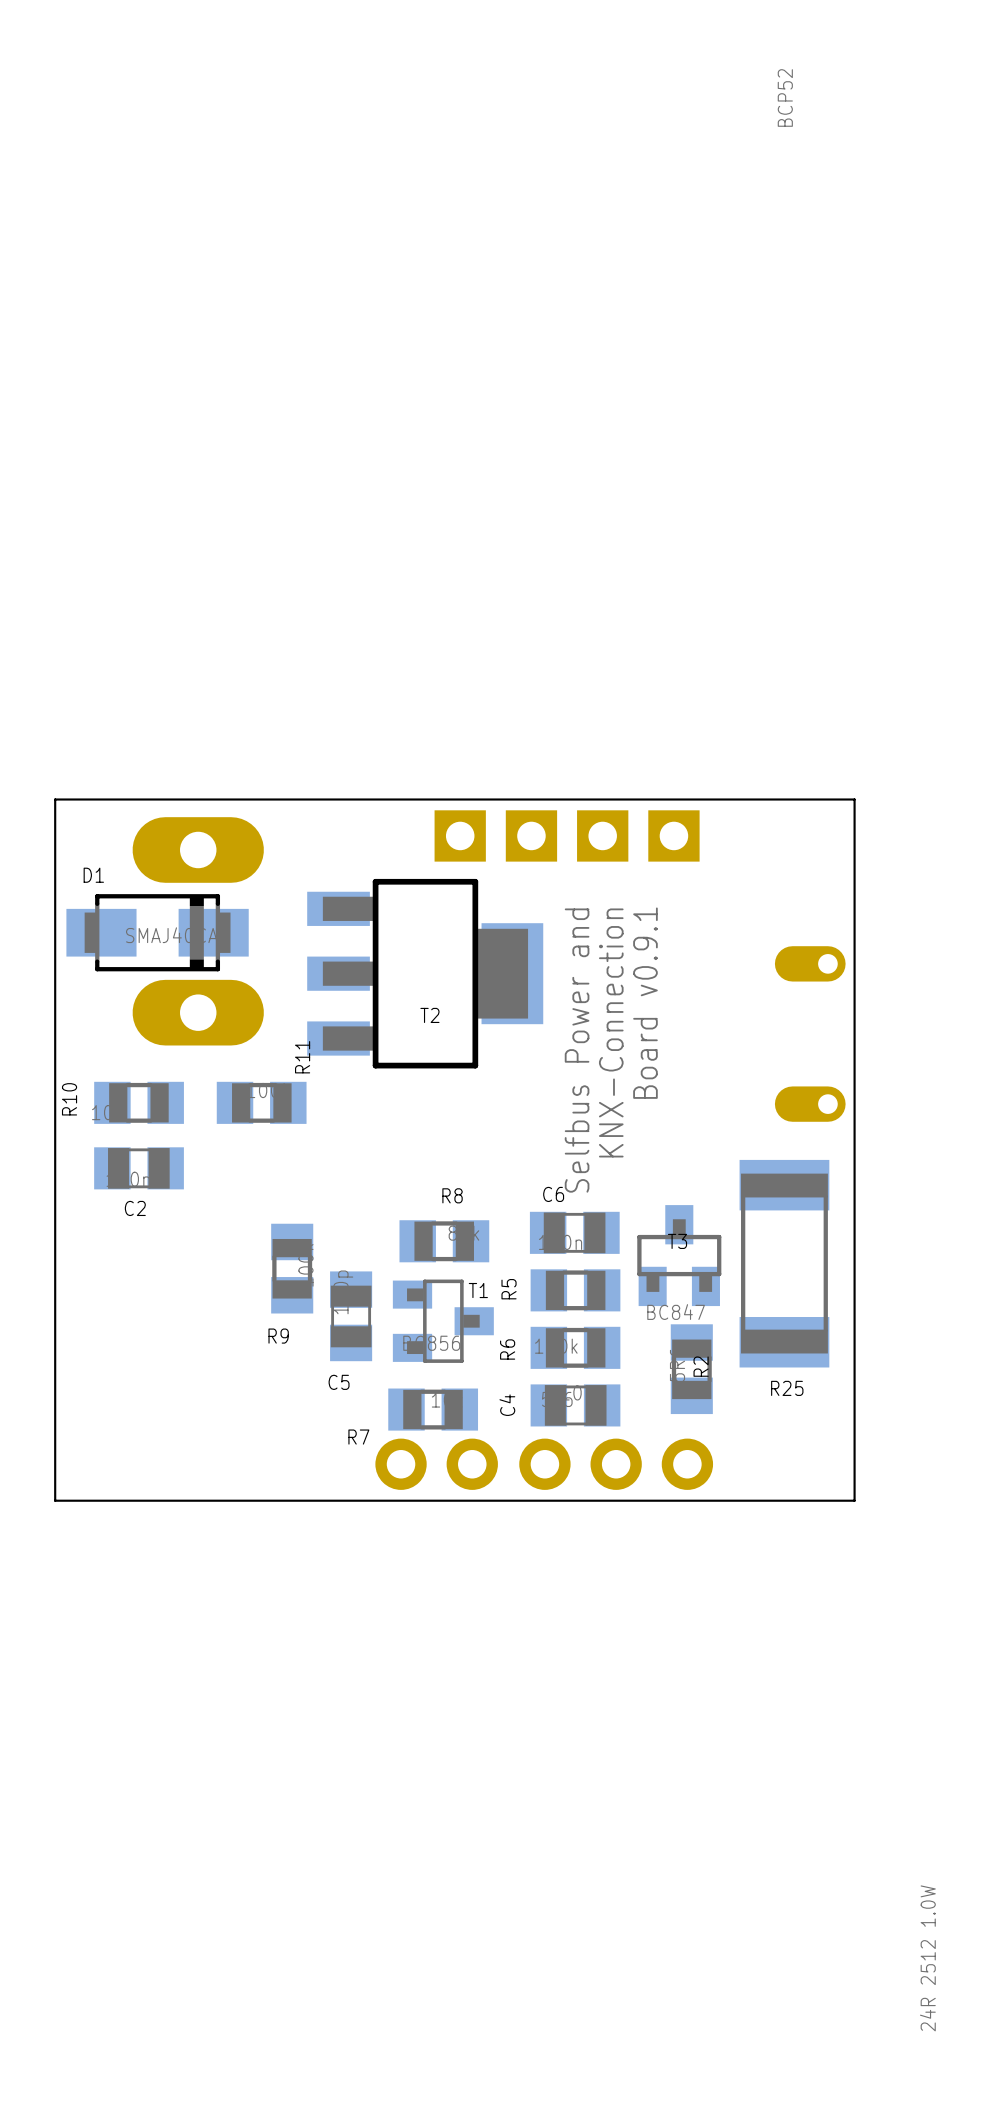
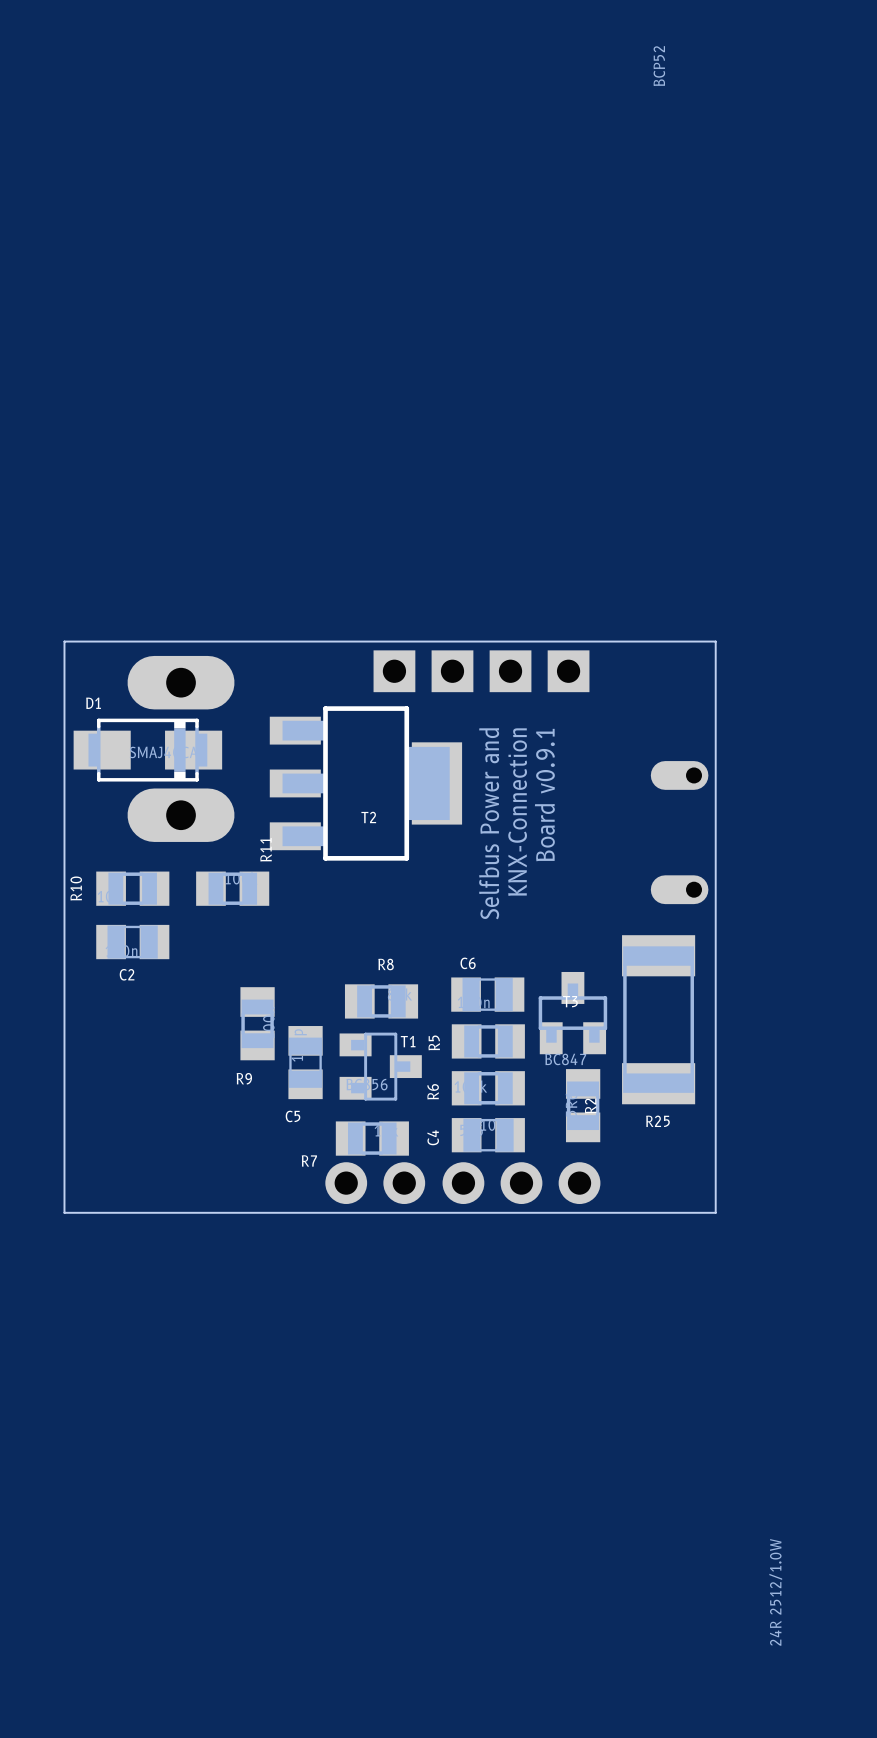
R25 value: 24R 2512 1.0W (927, 1958) -> 24R 2512/1.0W (775, 1592)

